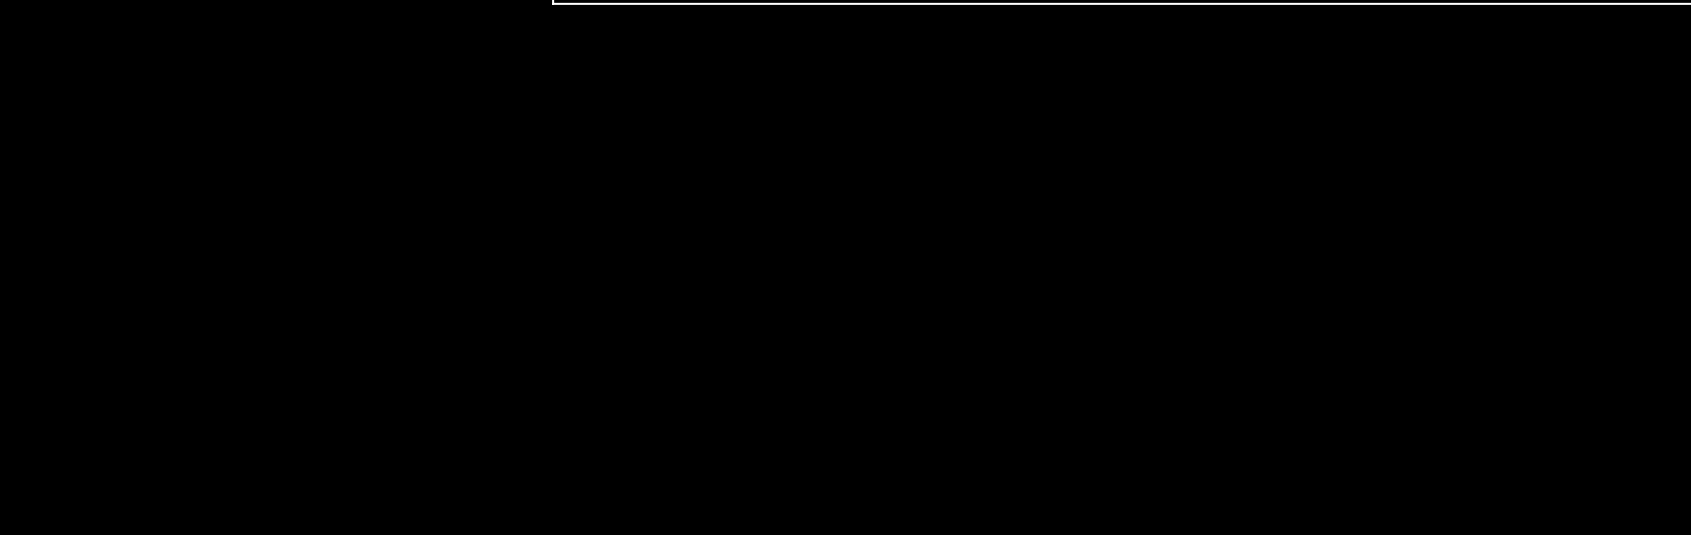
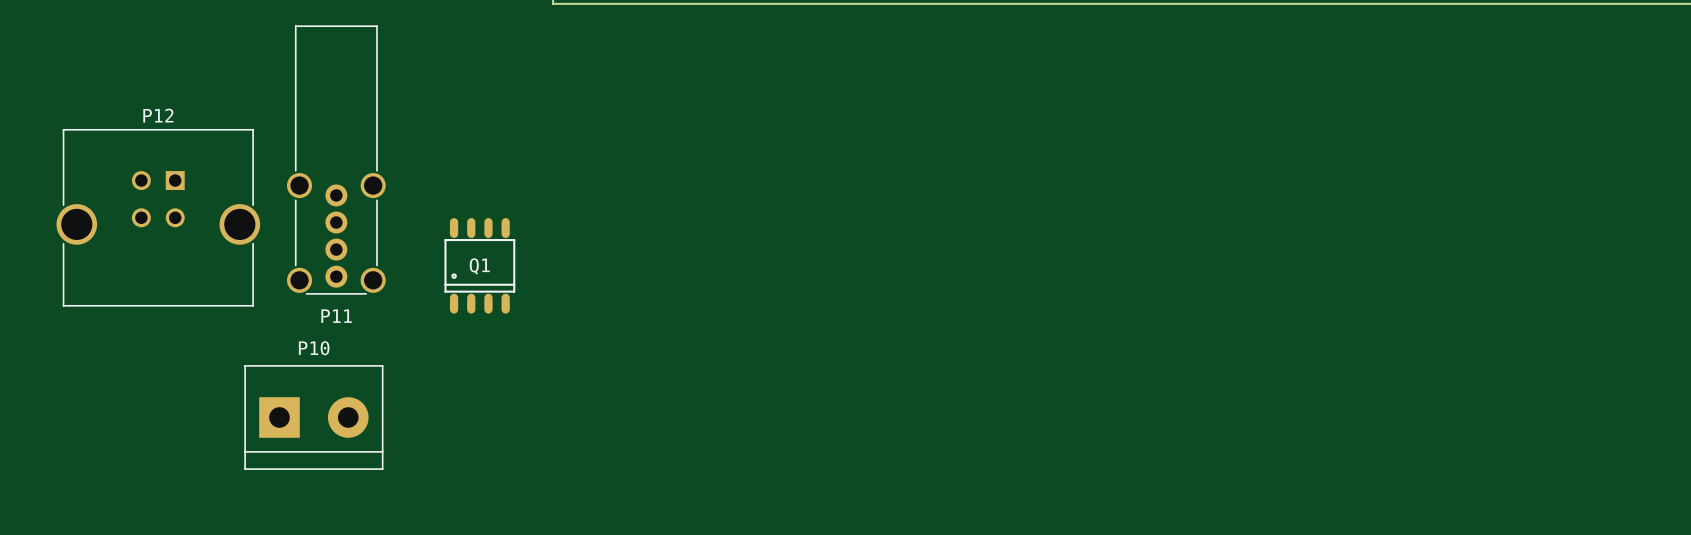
P11: none -> (336, 160)
P12: none -> (158, 217)
Q1: none -> (479, 265)
P10: none -> (313, 417)

